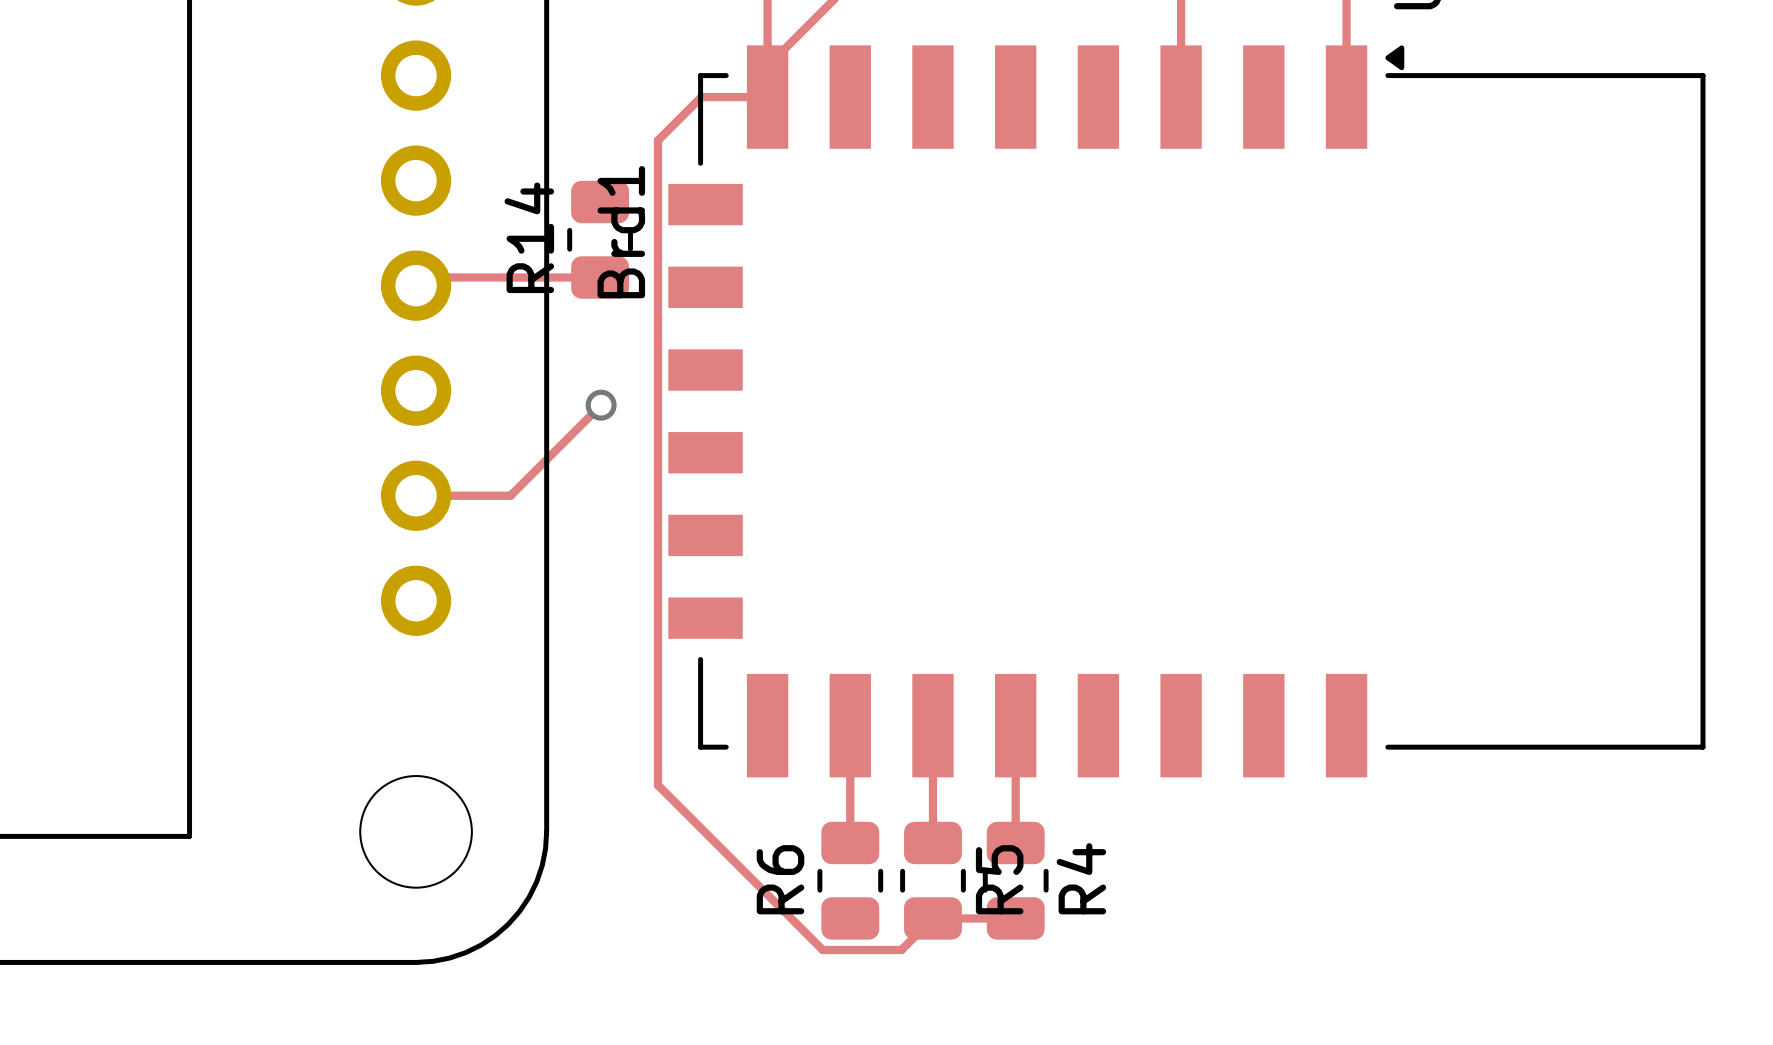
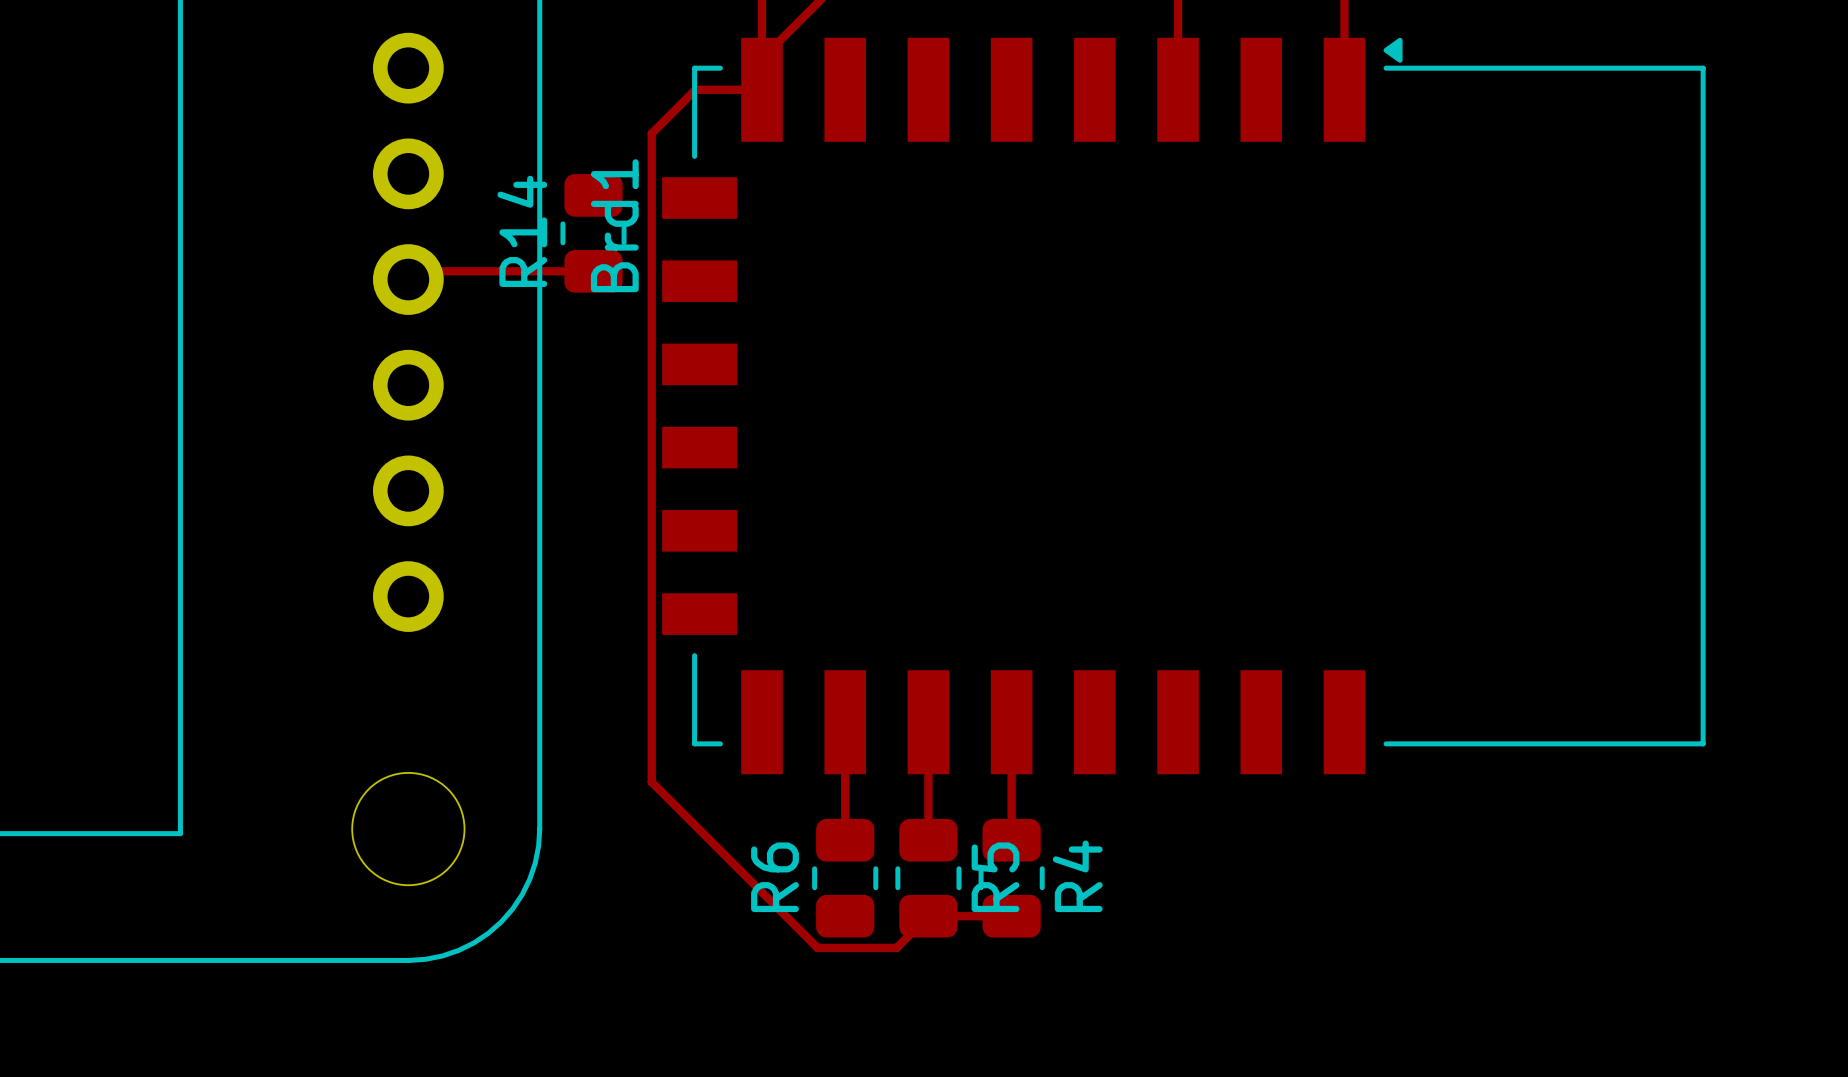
track: (601, 405) (510, 495) (416, 495) -> none
via: (601, 405) -> none

